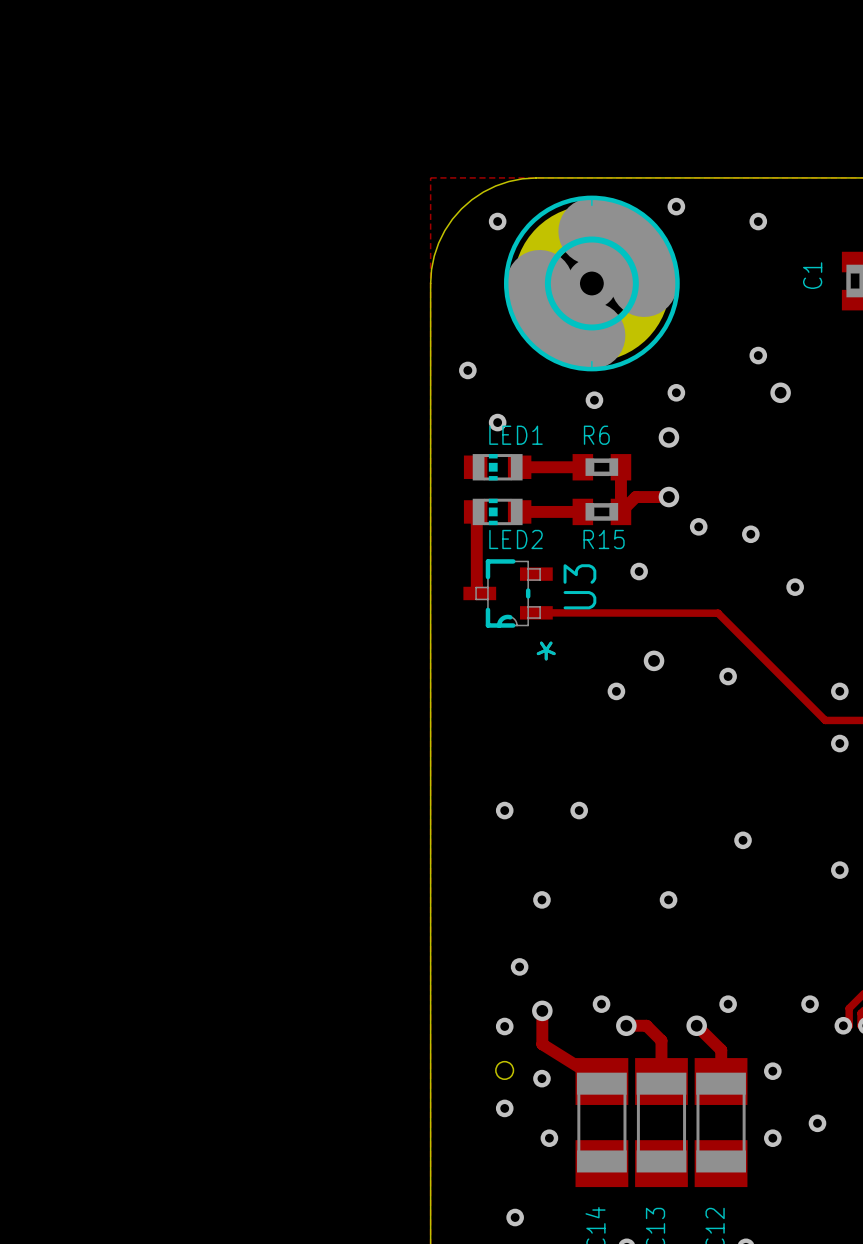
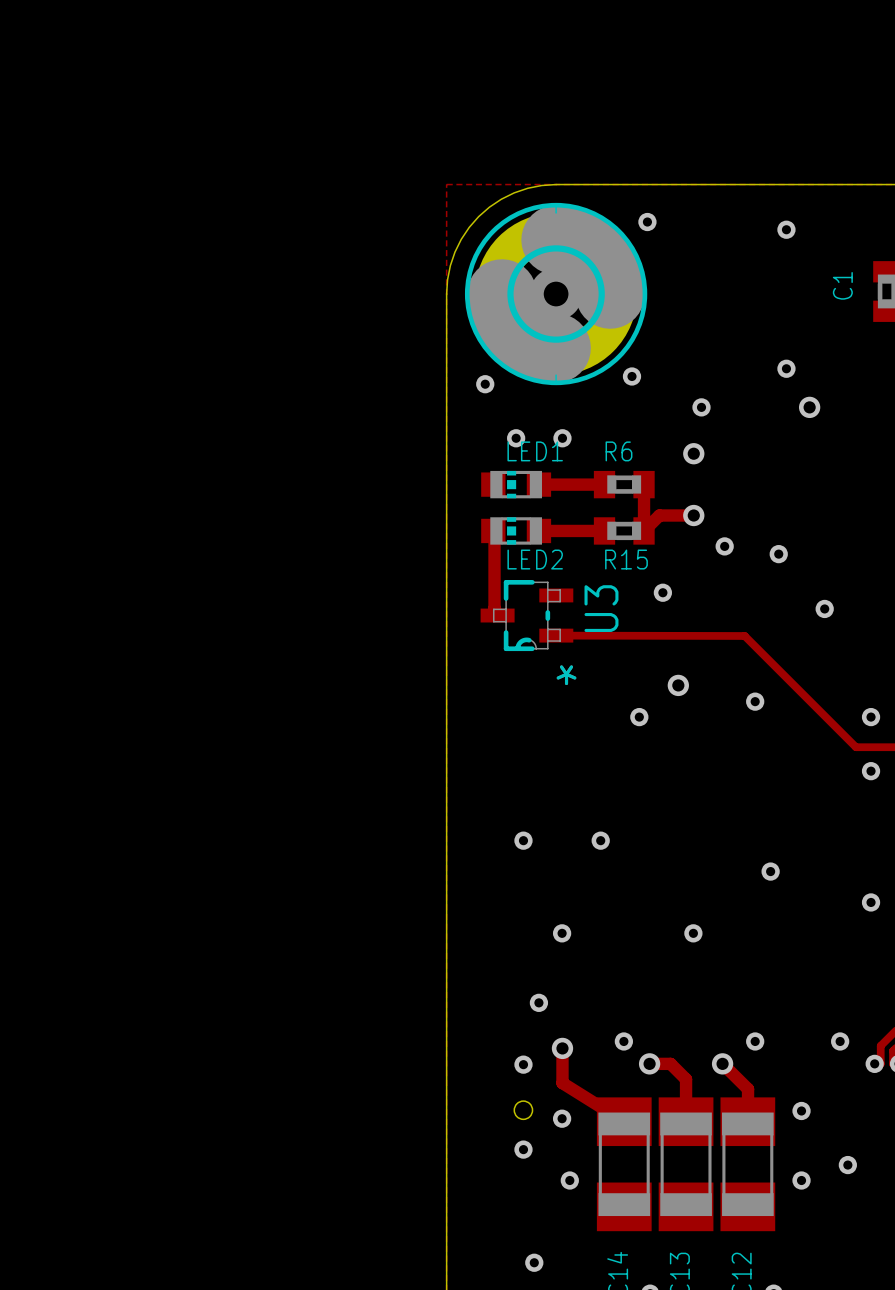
via position: (676, 206) -> (647, 222)
via: (497, 221) -> none
part position: (591, 283) -> (556, 294)
via: none -> (631, 376)
via: (594, 400) -> none
via: none -> (562, 438)

